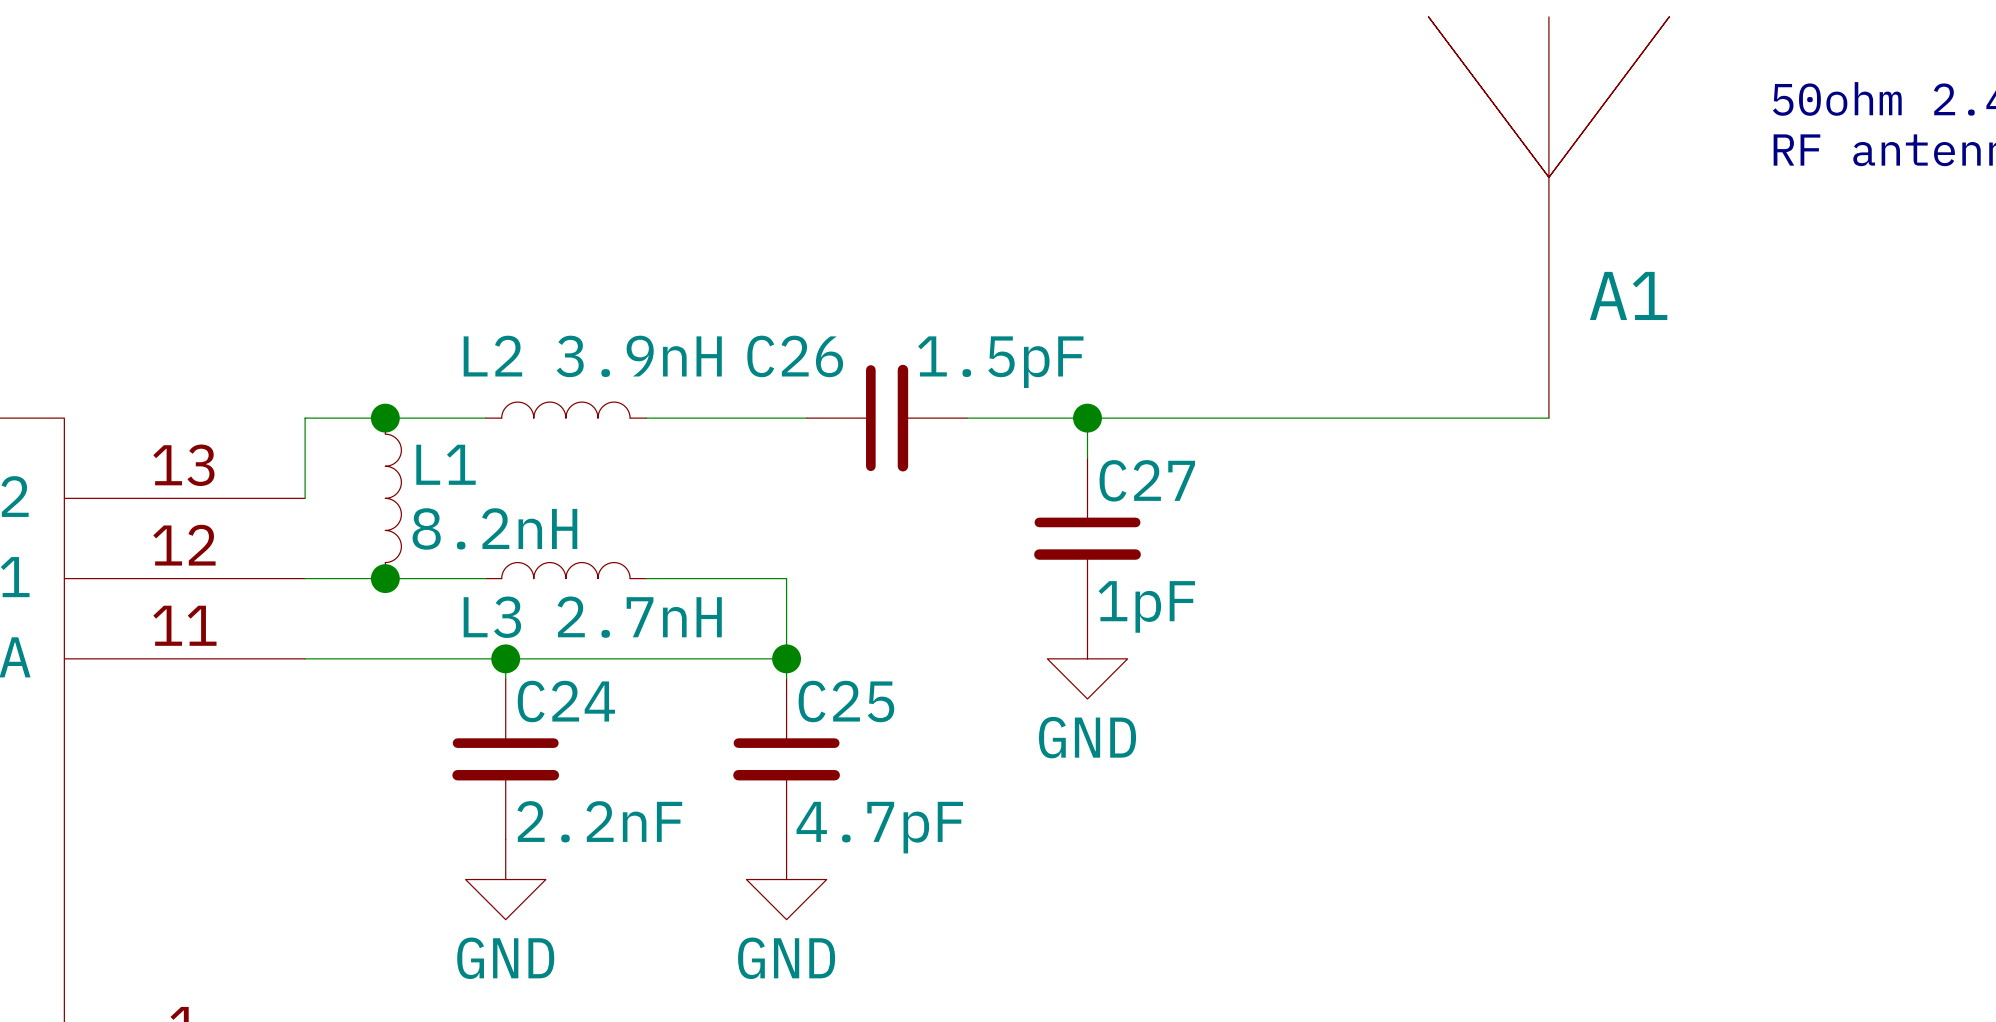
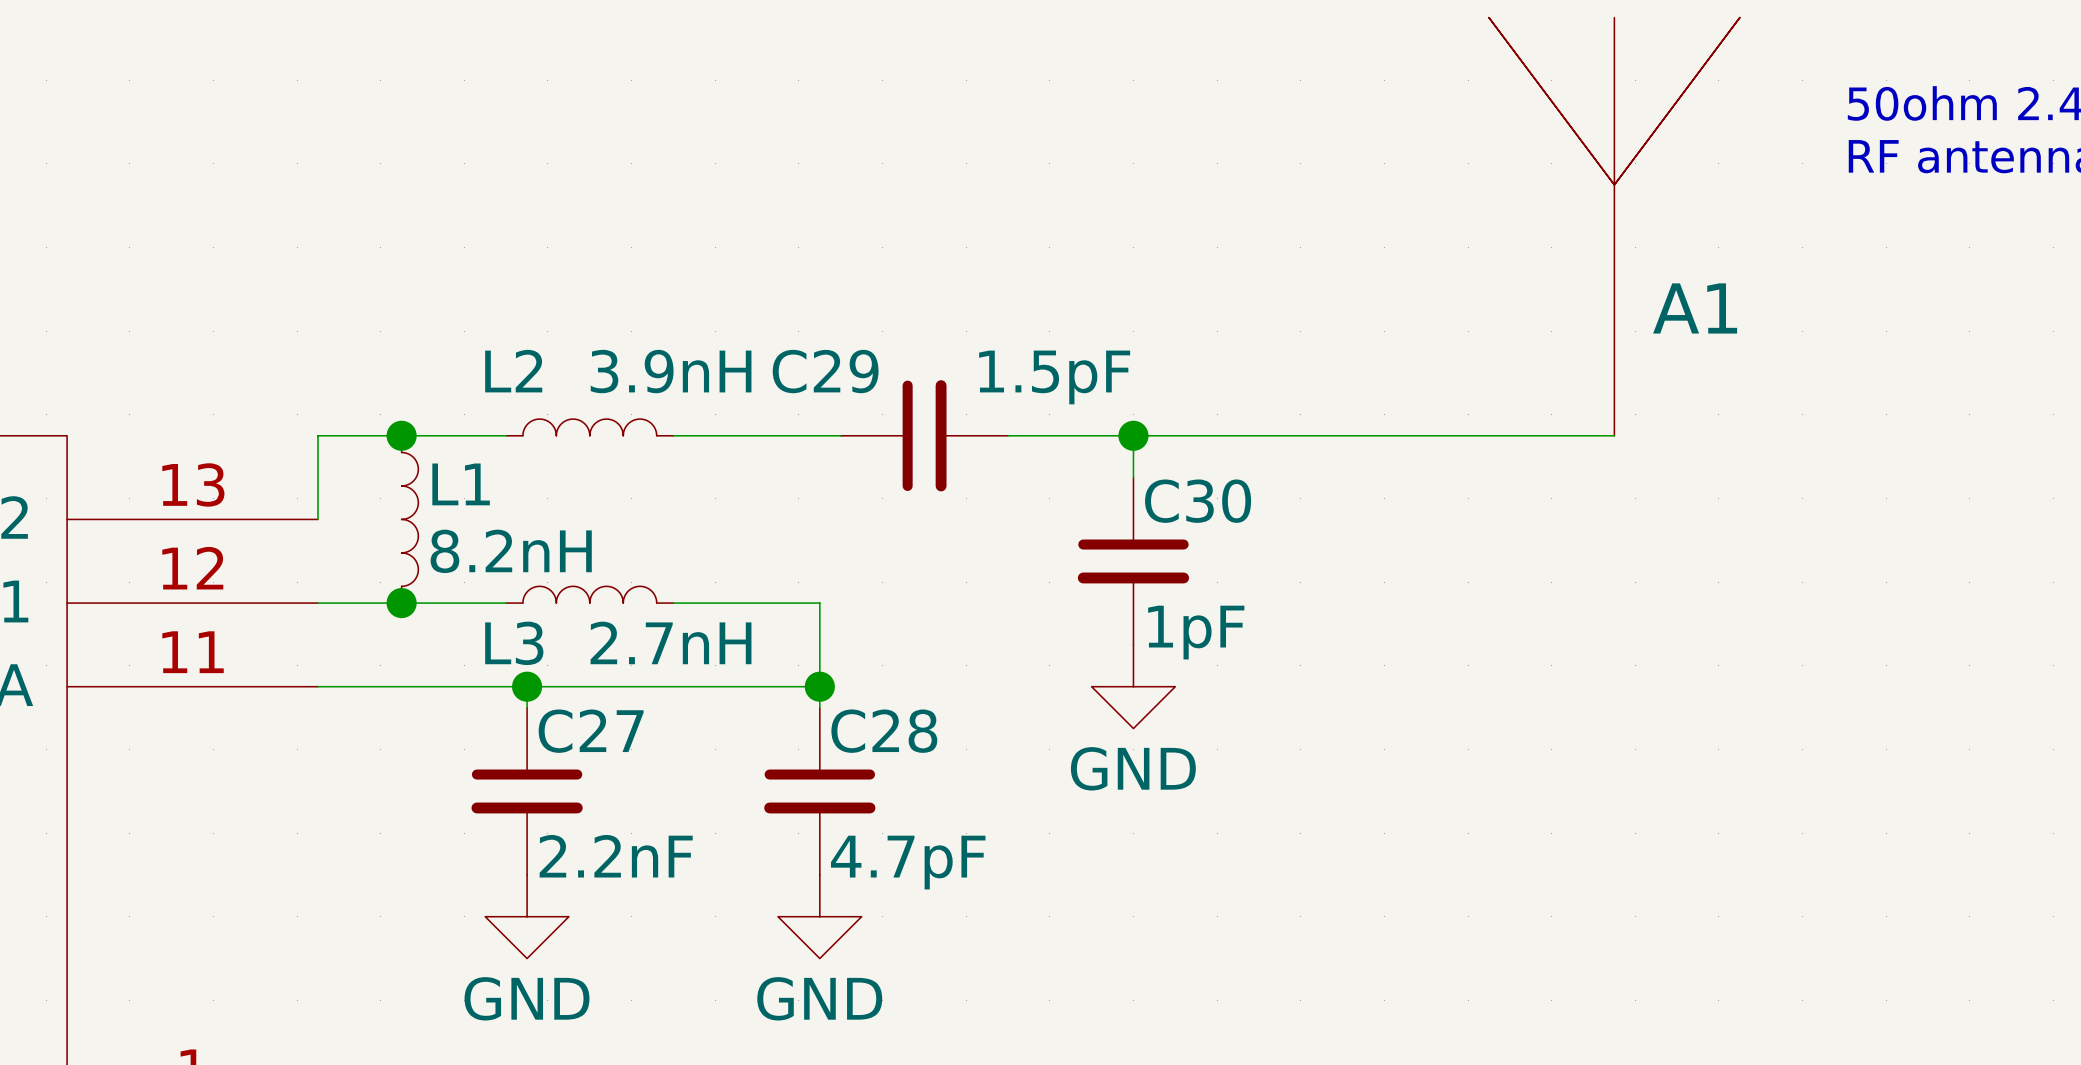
C26 name: C26 (795, 356) -> C29 (825, 371)
C27 name: C27 (1147, 480) -> C30 (1198, 501)
C24 name: C24 (566, 701) -> C27 (591, 731)
C25 name: C25 (846, 701) -> C28 (884, 731)

